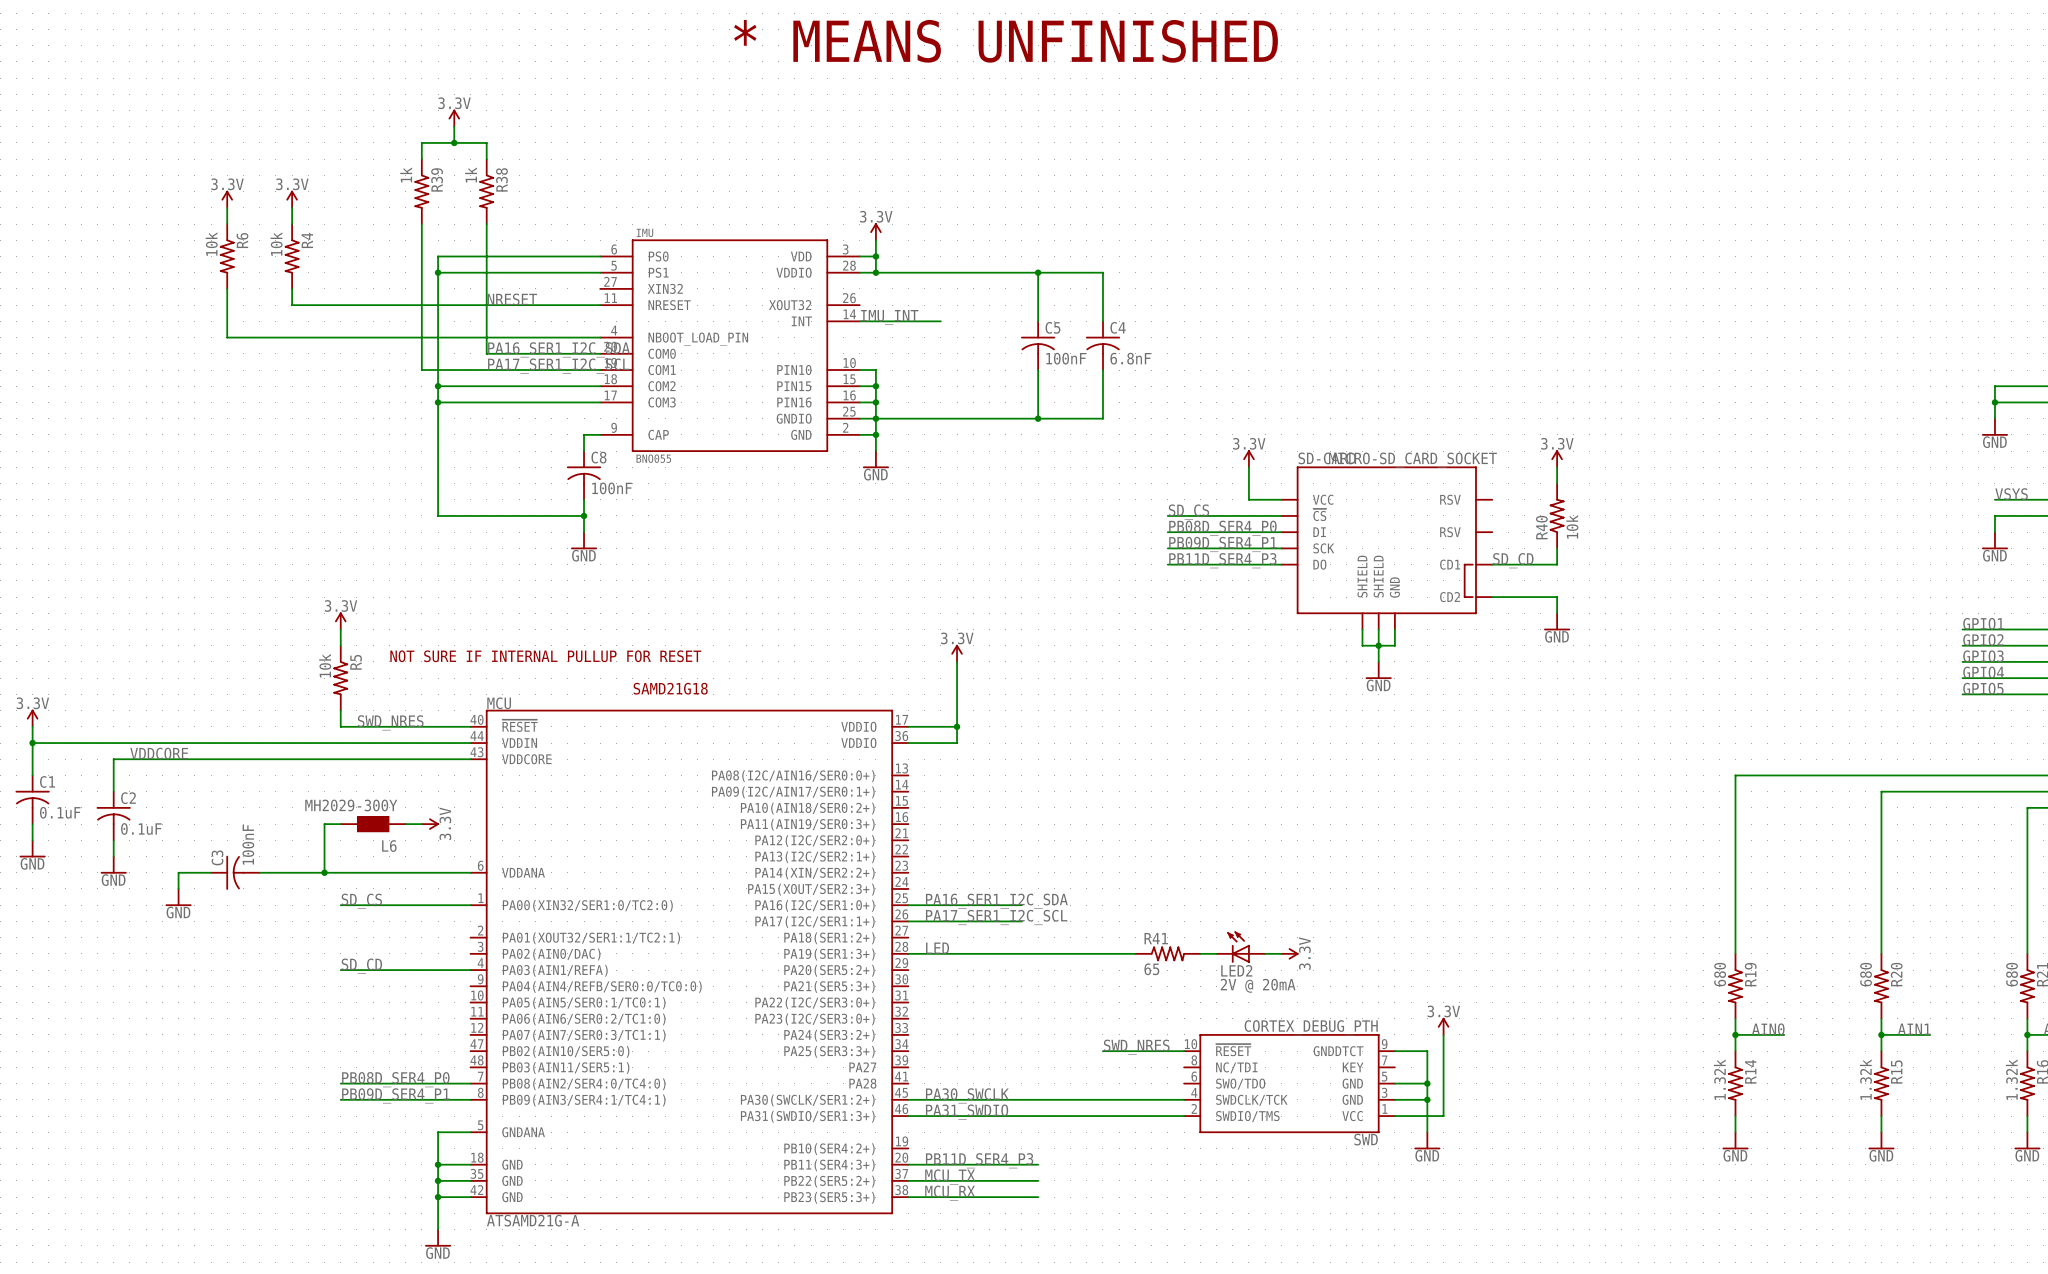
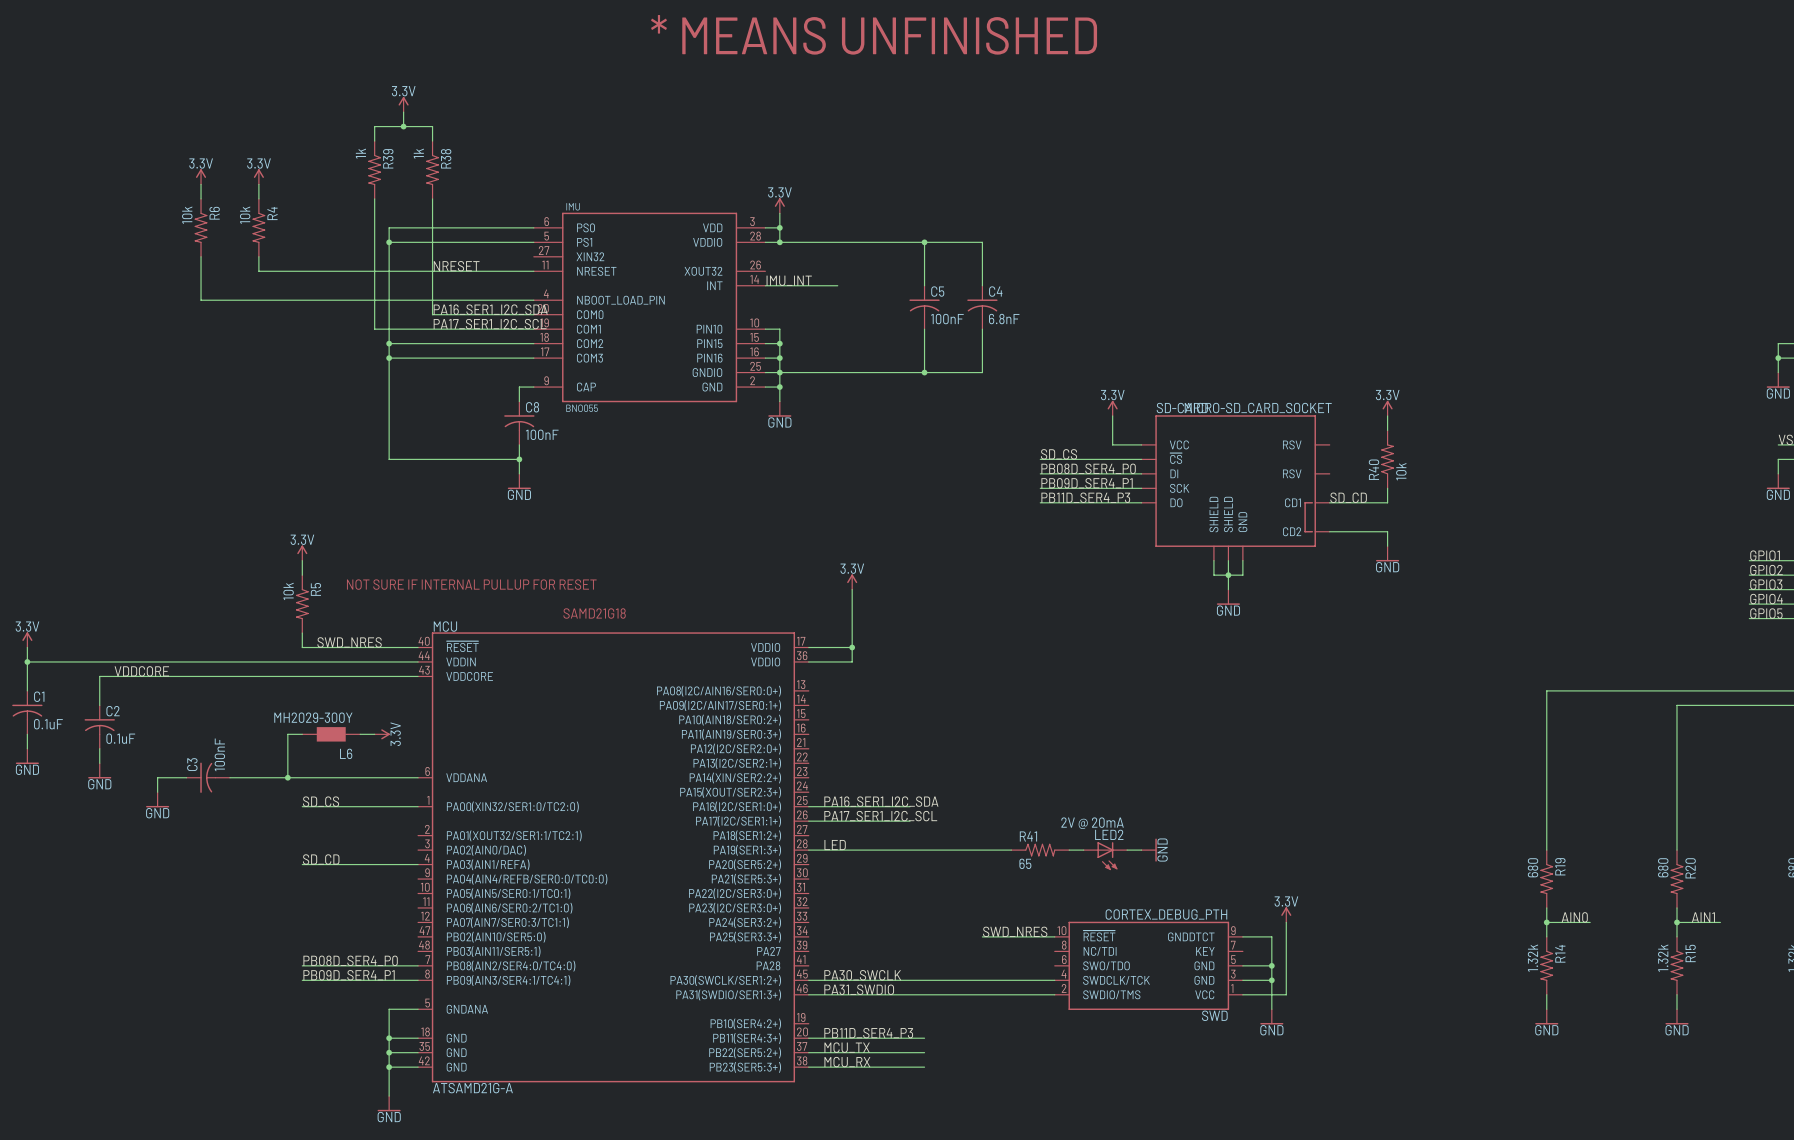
LED2 rotation: 0° (1238, 947) -> 180° (1107, 856)
power symbol: 3.3V (1289, 953) -> GND (1149, 850)

